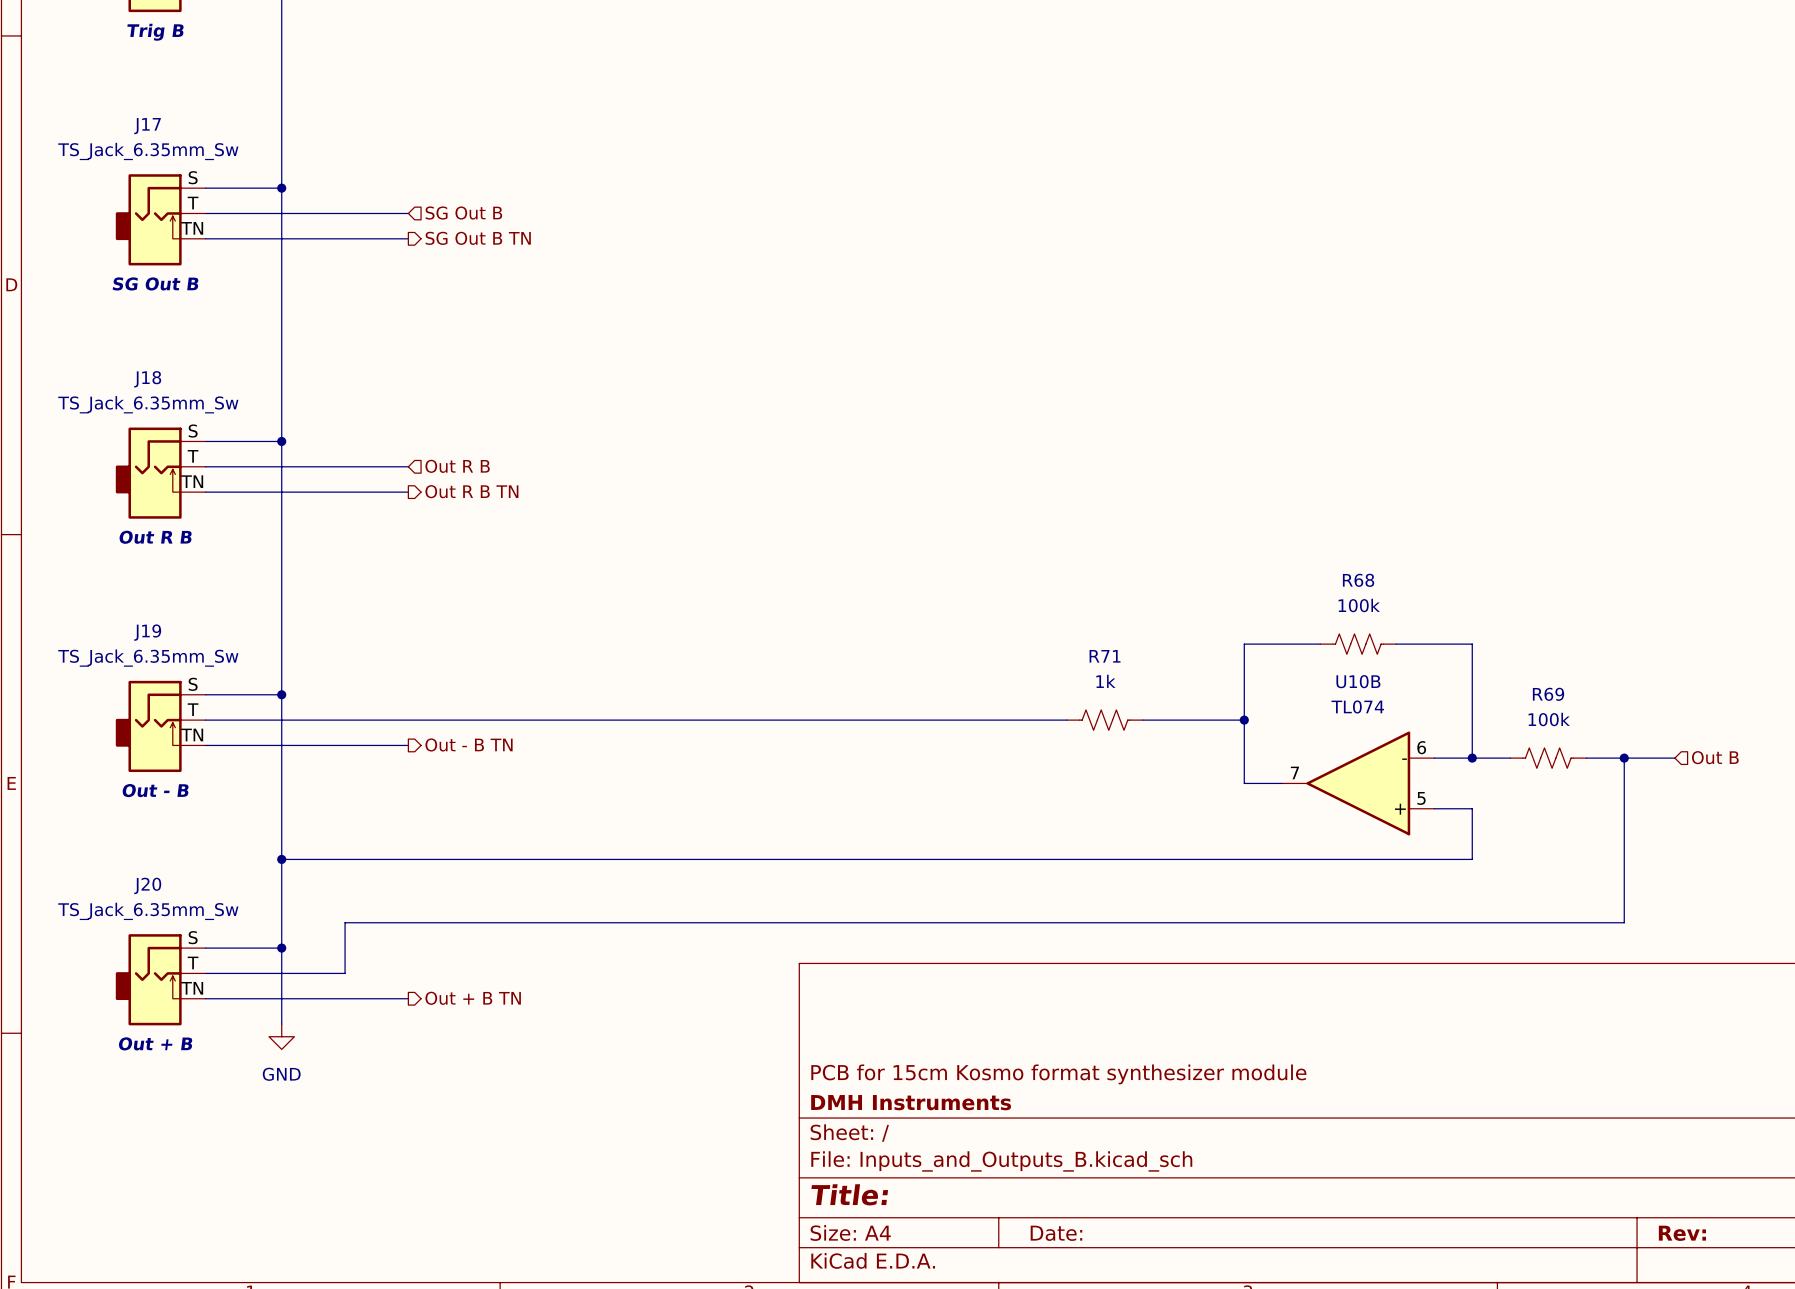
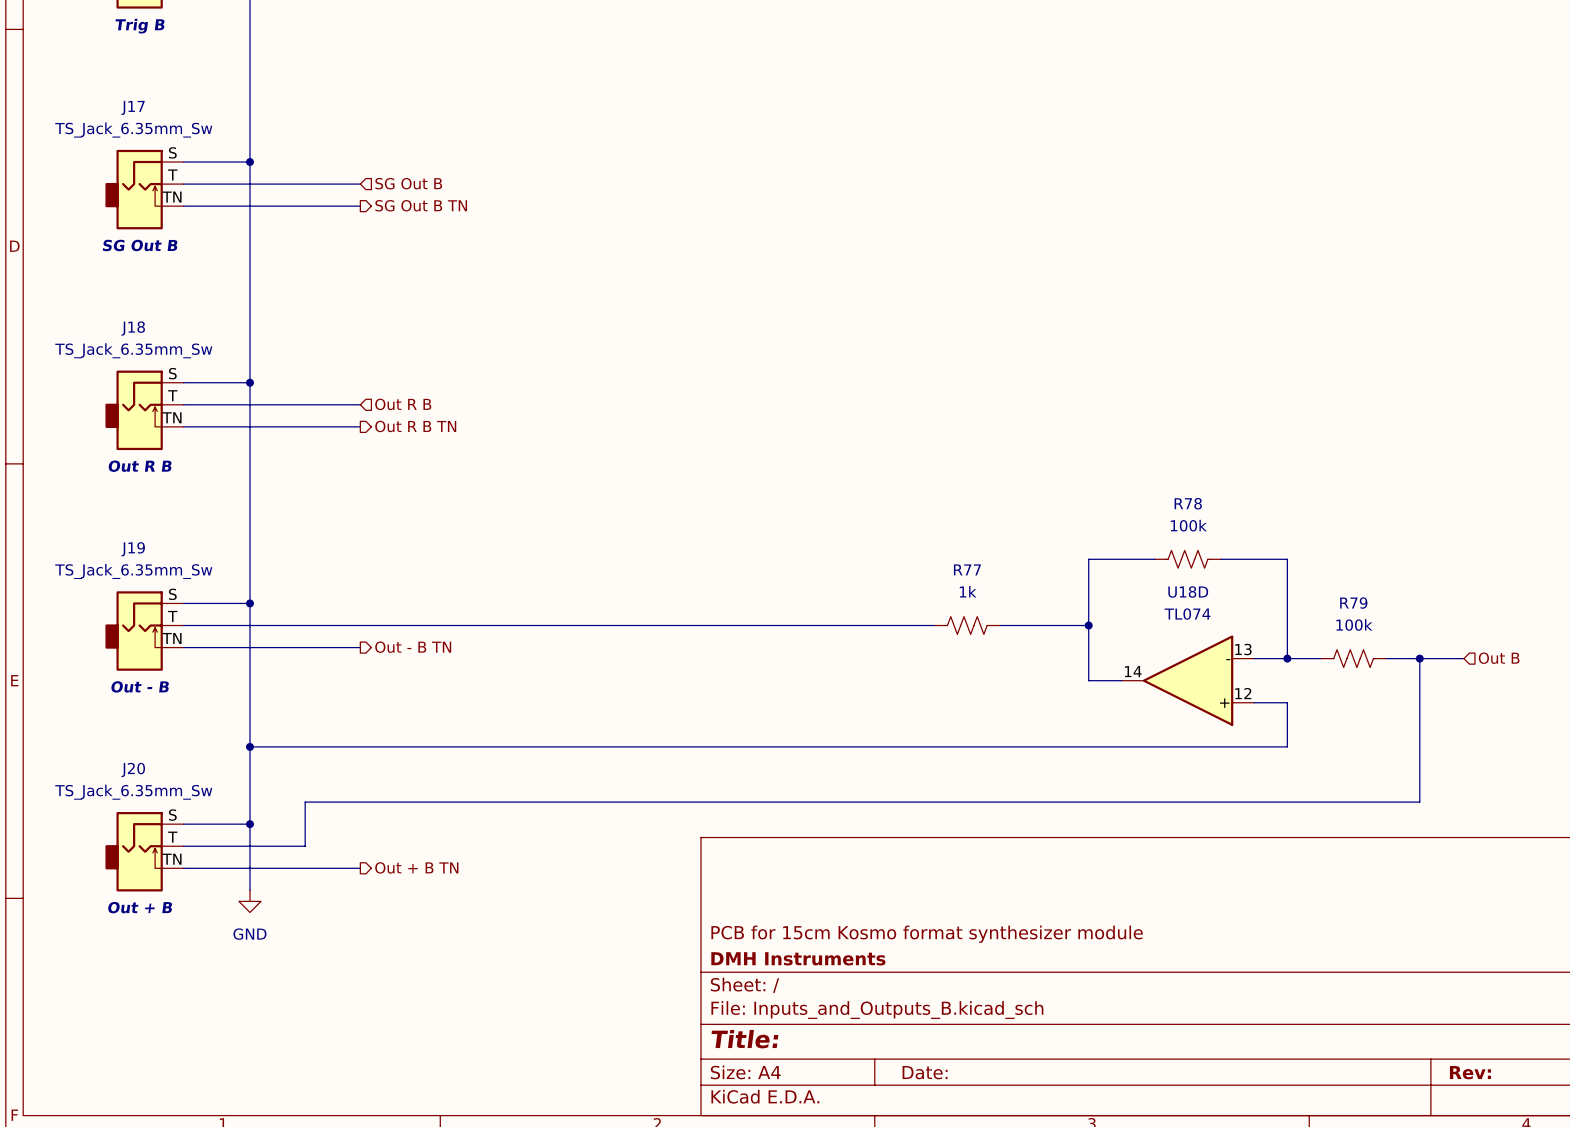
R68 name: R68 (1358, 580) -> R78 (1188, 503)
R71 name: R71 (1105, 656) -> R77 (967, 569)
U10B name: U10B (1358, 681) -> U18D (1188, 592)
R69 name: R69 (1548, 694) -> R79 (1353, 603)
U10B pin number: 6 (1421, 747) -> 13 (1243, 649)
U10B pin number: 7 (1294, 772) -> 14 (1133, 671)
U10B pin number: 5 (1421, 798) -> 12 (1243, 693)

